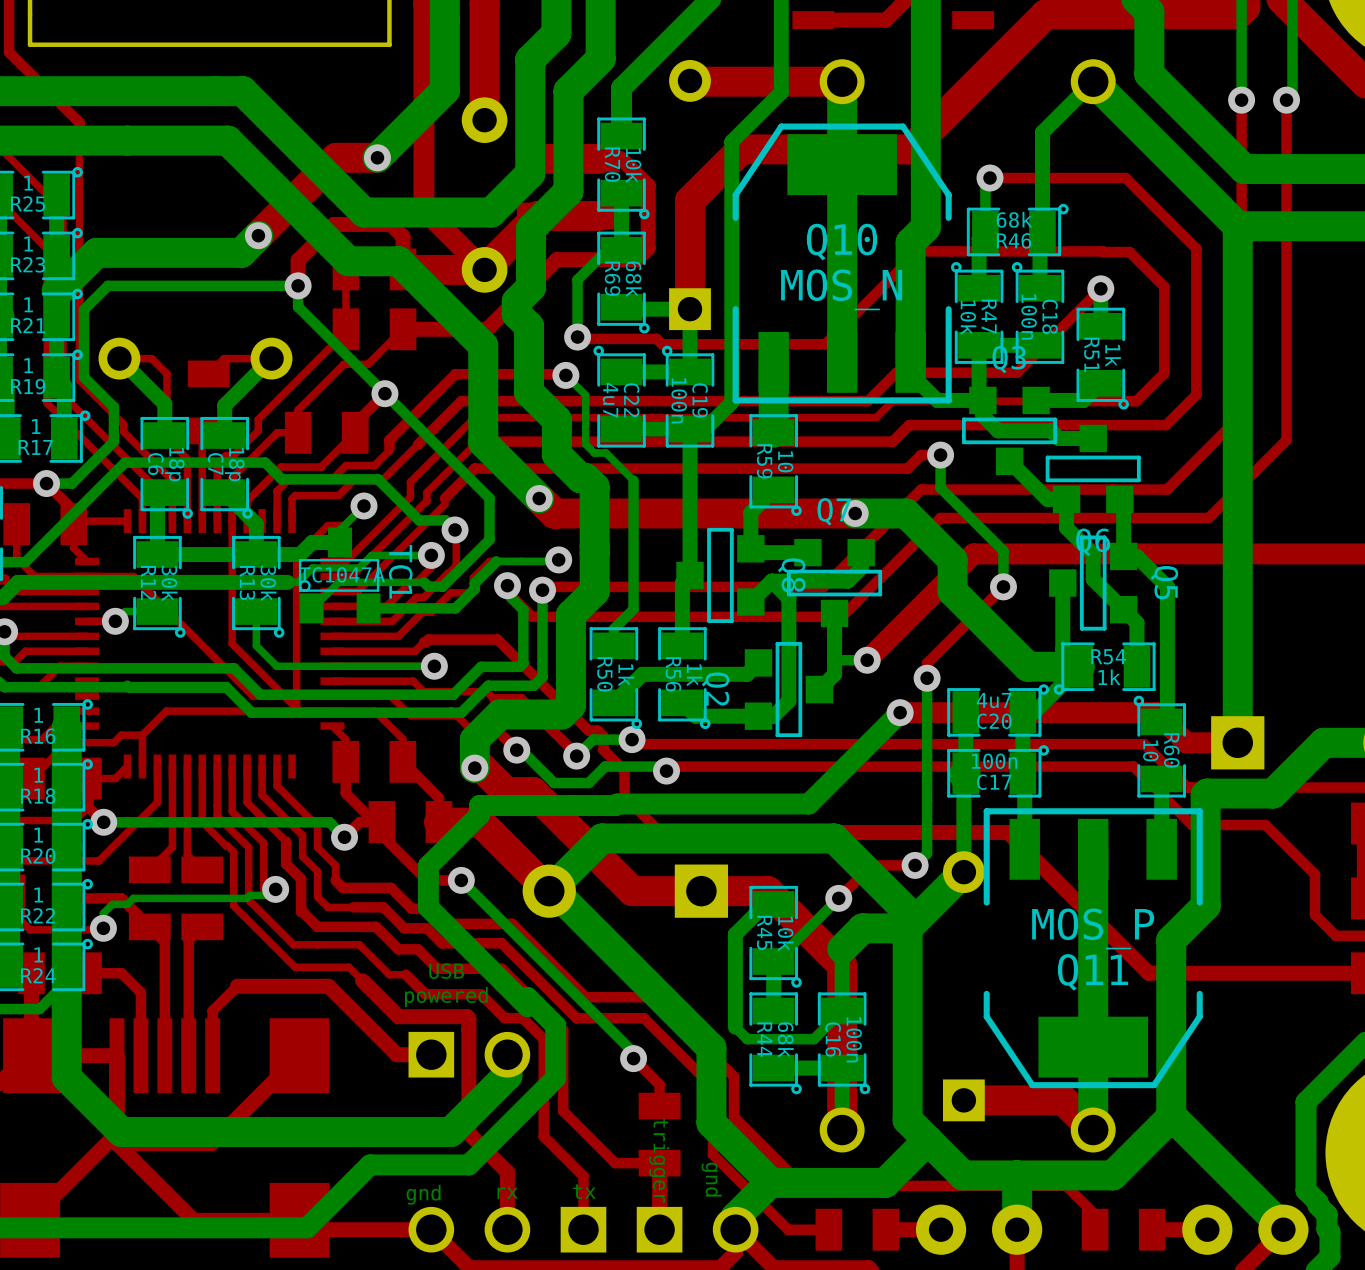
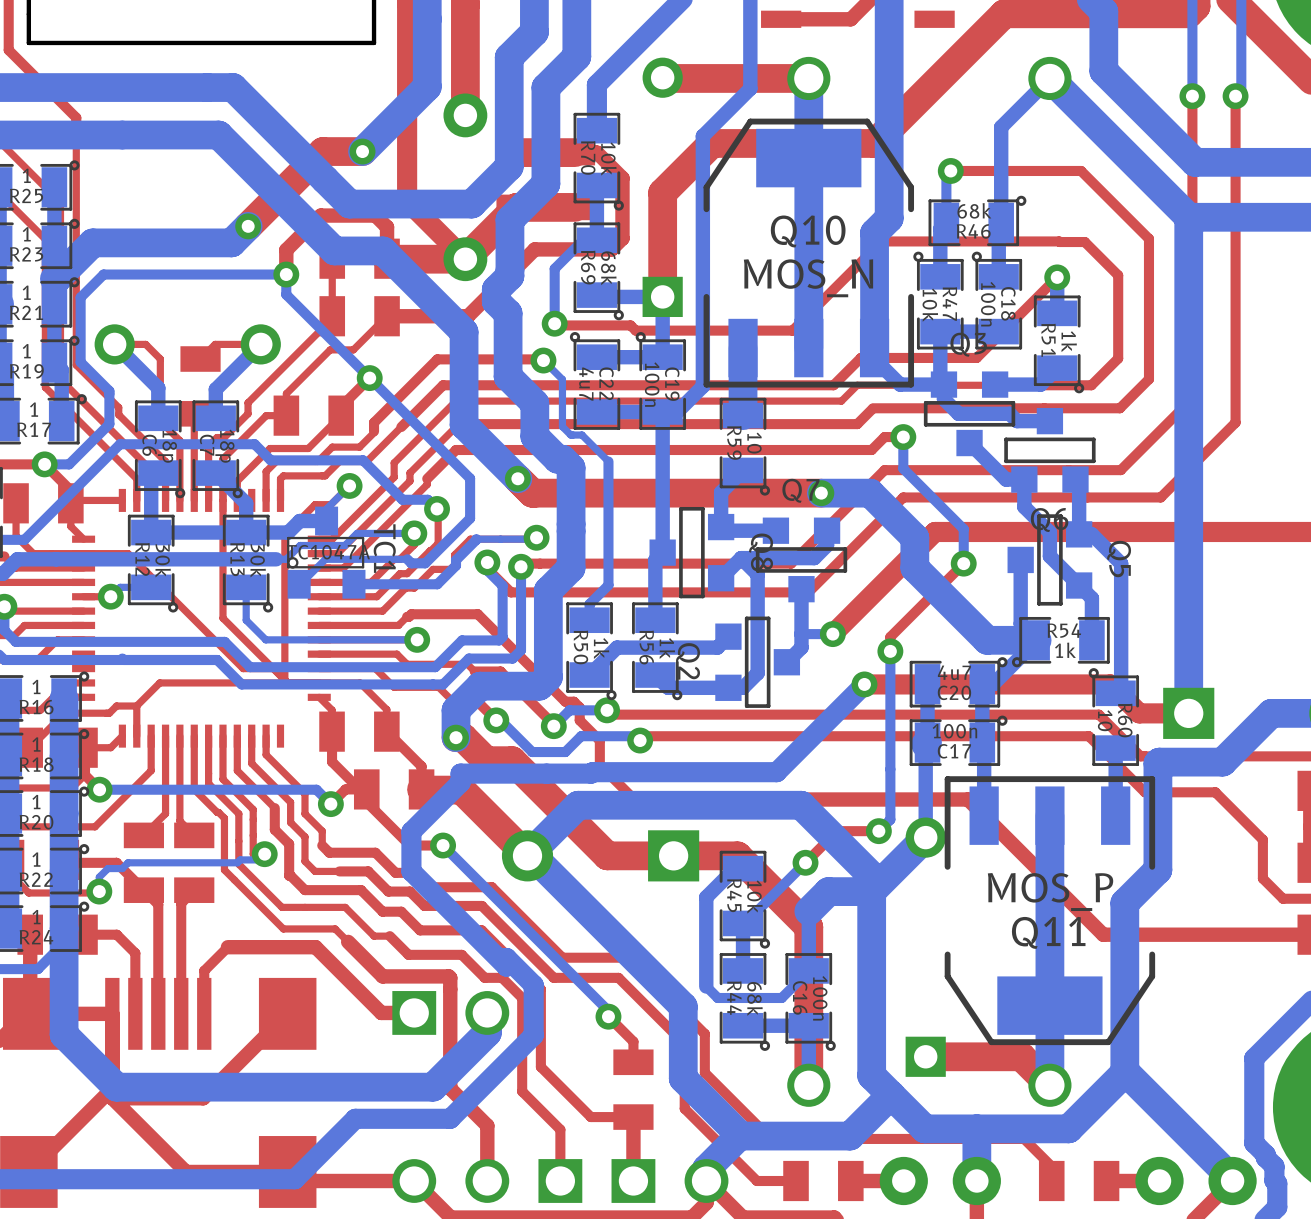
text: USB (446, 971) -> none
text: powered (446, 997) -> none
text: trigger (659, 1160) -> none
text: gnd (711, 1179) -> none
text: tx (584, 1191) -> none
text: rx (507, 1193) -> none
text: gnd (423, 1194) -> none

